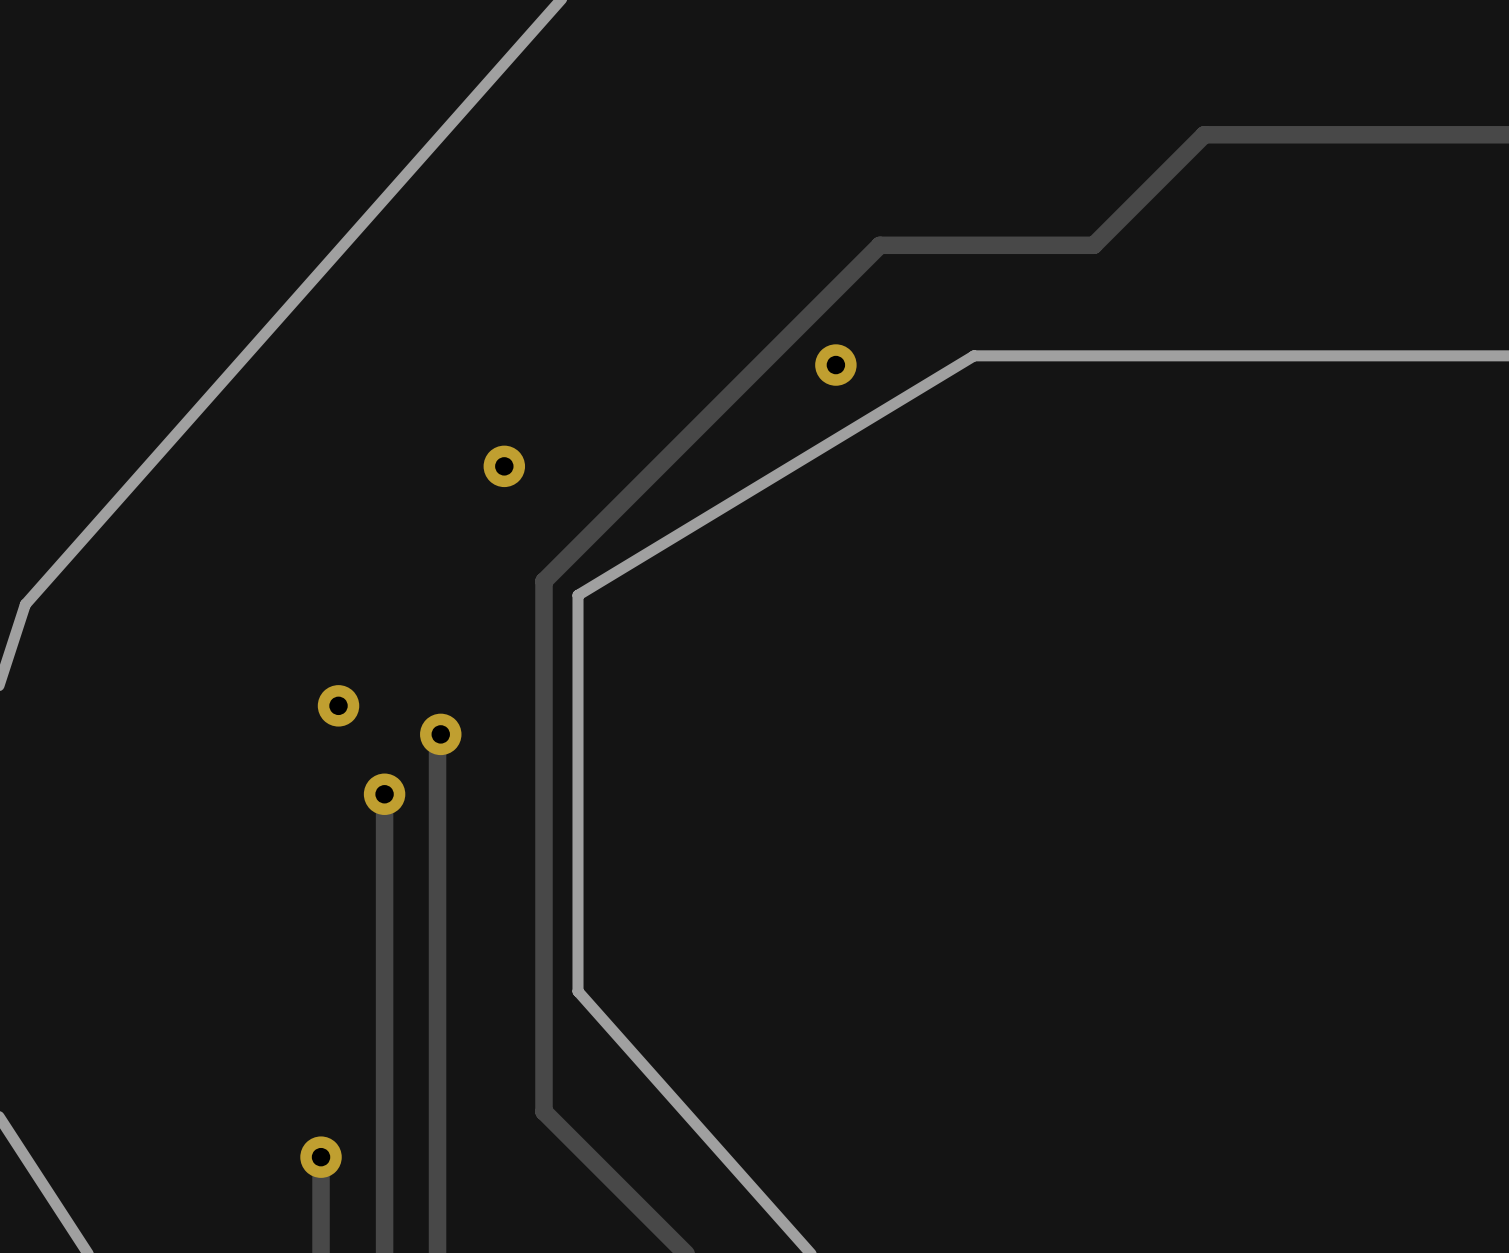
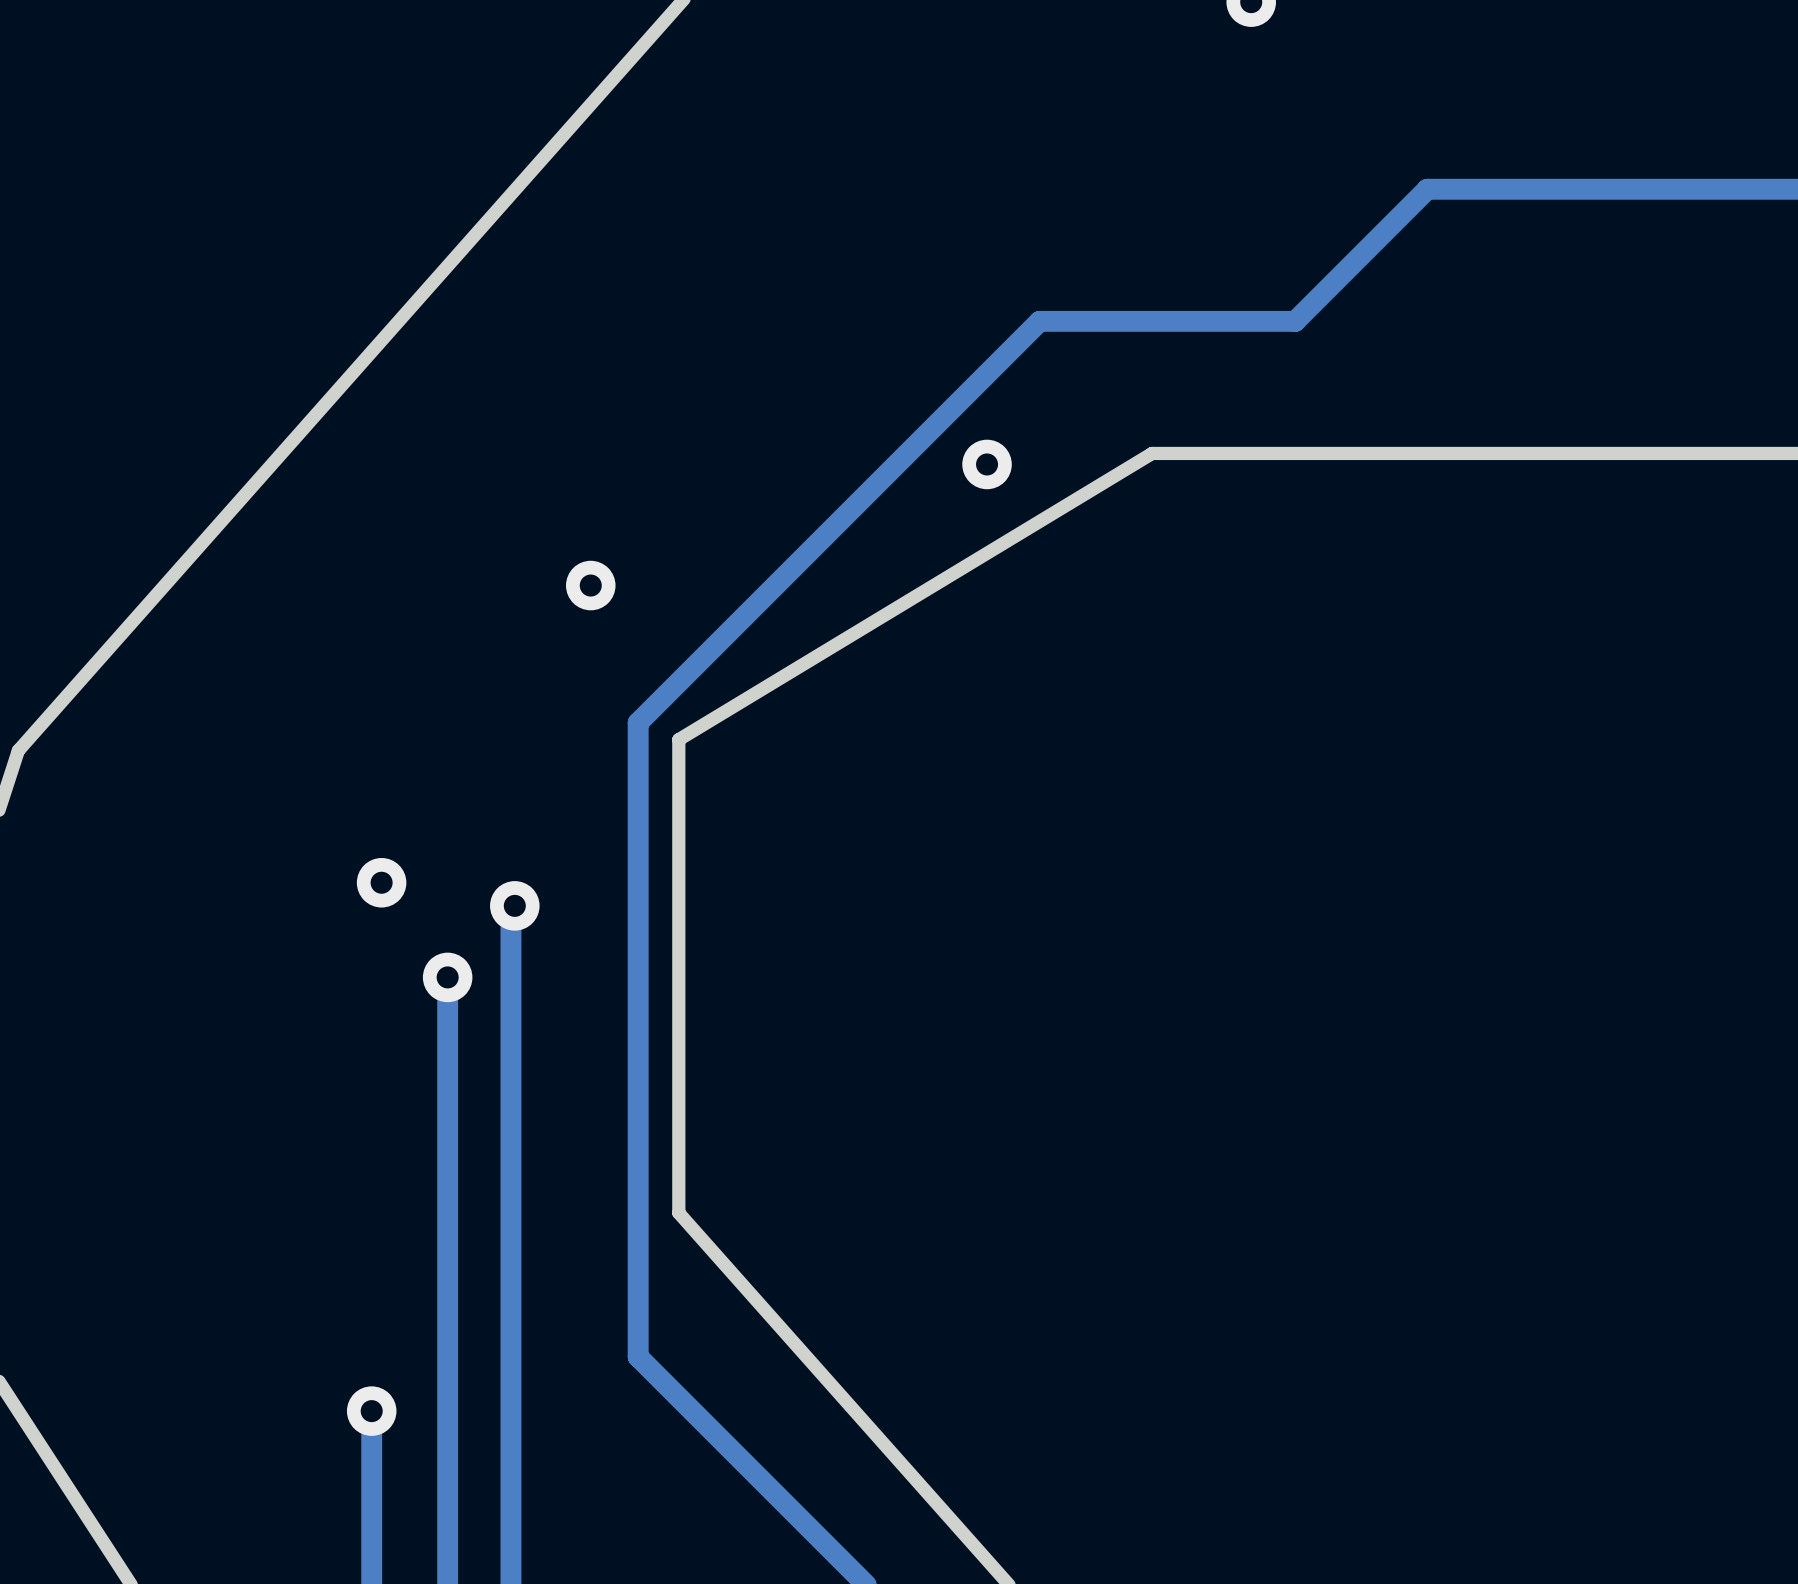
via position: (338, 705) -> (381, 882)

